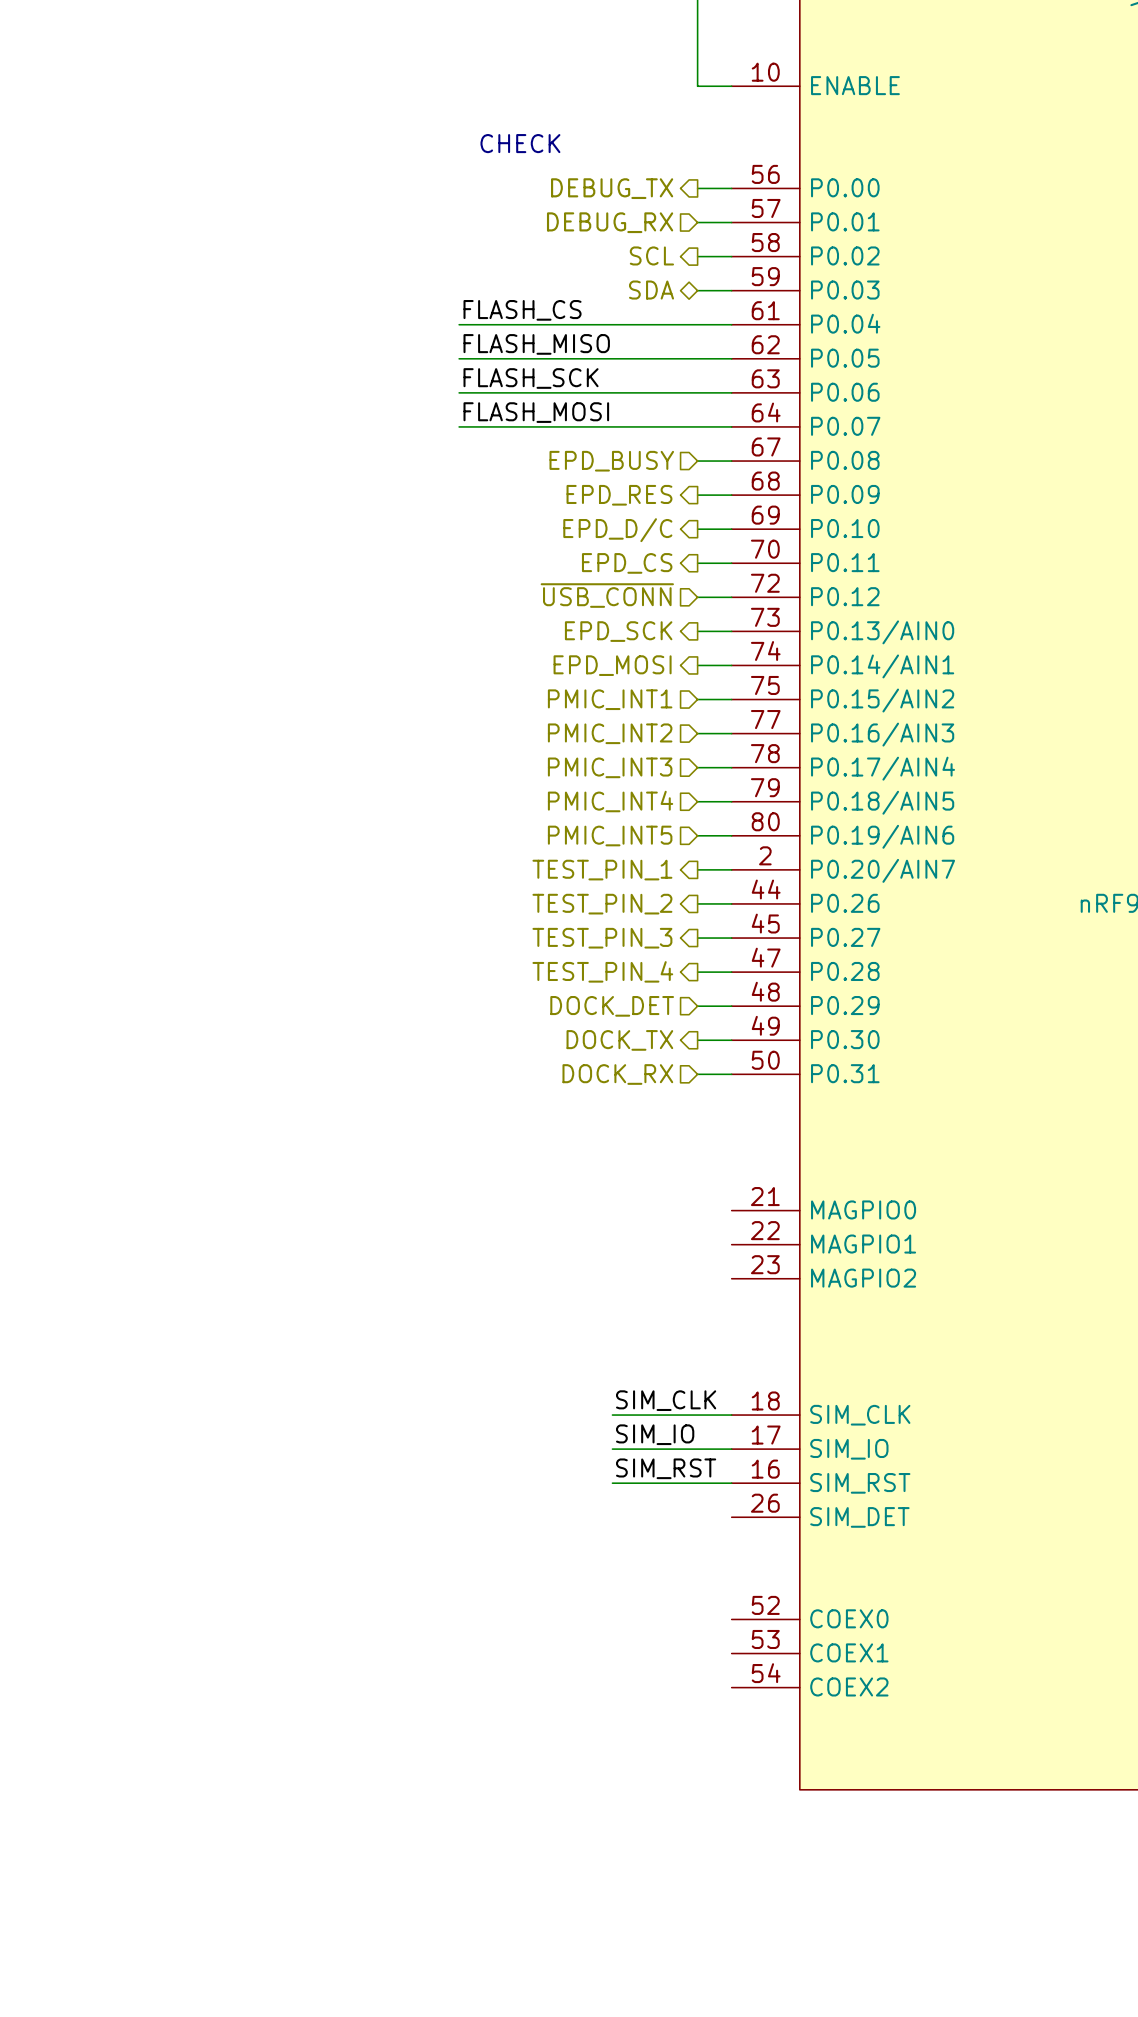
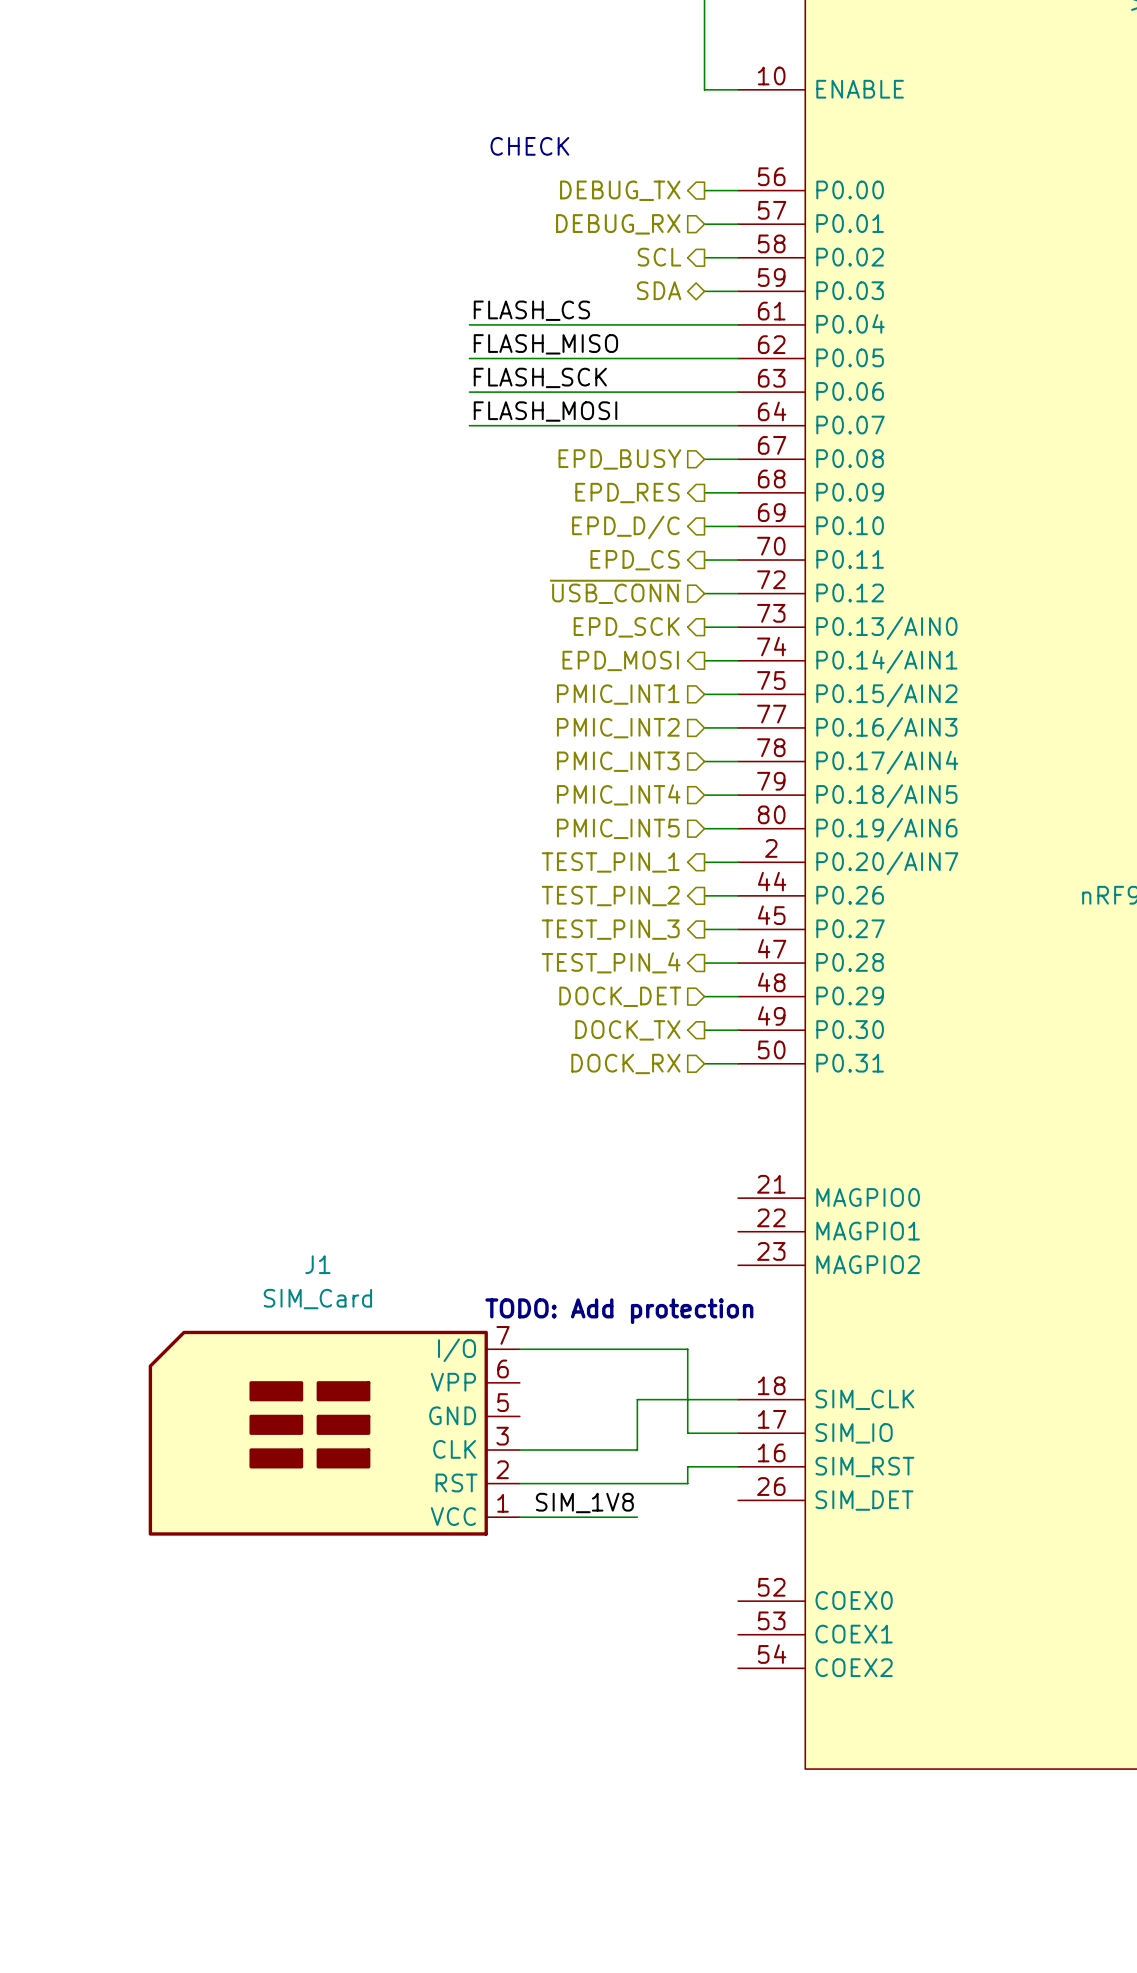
text: none -> TODO: Add protection (619, 1311)
label: SIM_CLK (666, 1400) -> none
wire: (612, 1415) (629, 1415) -> (519, 1450) (637, 1450) (637, 1399)
label: SIM_IO (655, 1434) -> none
J1: none -> SIM_Card (334, 1433)
wire: (612, 1449) (680, 1449) -> (519, 1349) (687, 1349) (687, 1433)
label: SIM_RST (666, 1468) -> none
wire: (612, 1483) (680, 1483) -> (519, 1483) (687, 1483) (687, 1466)
label: none -> SIM_1V8 (584, 1503)
wire: none -> (519, 1517) (637, 1517)

